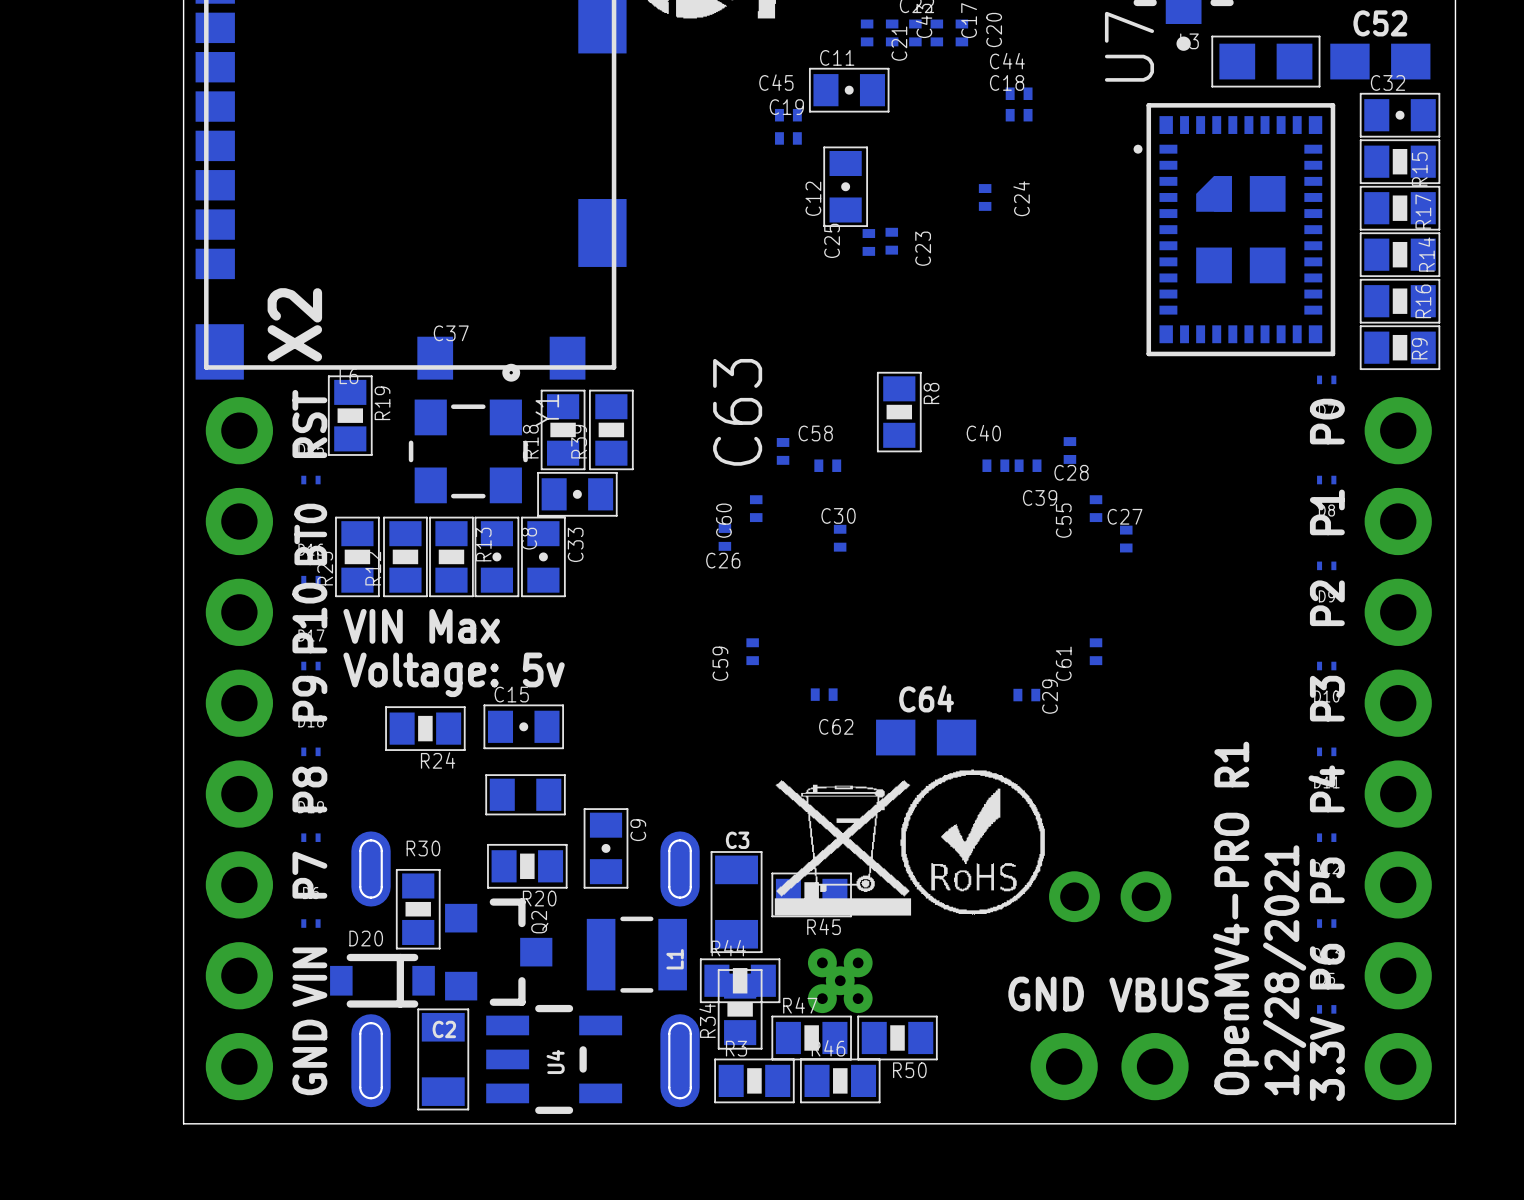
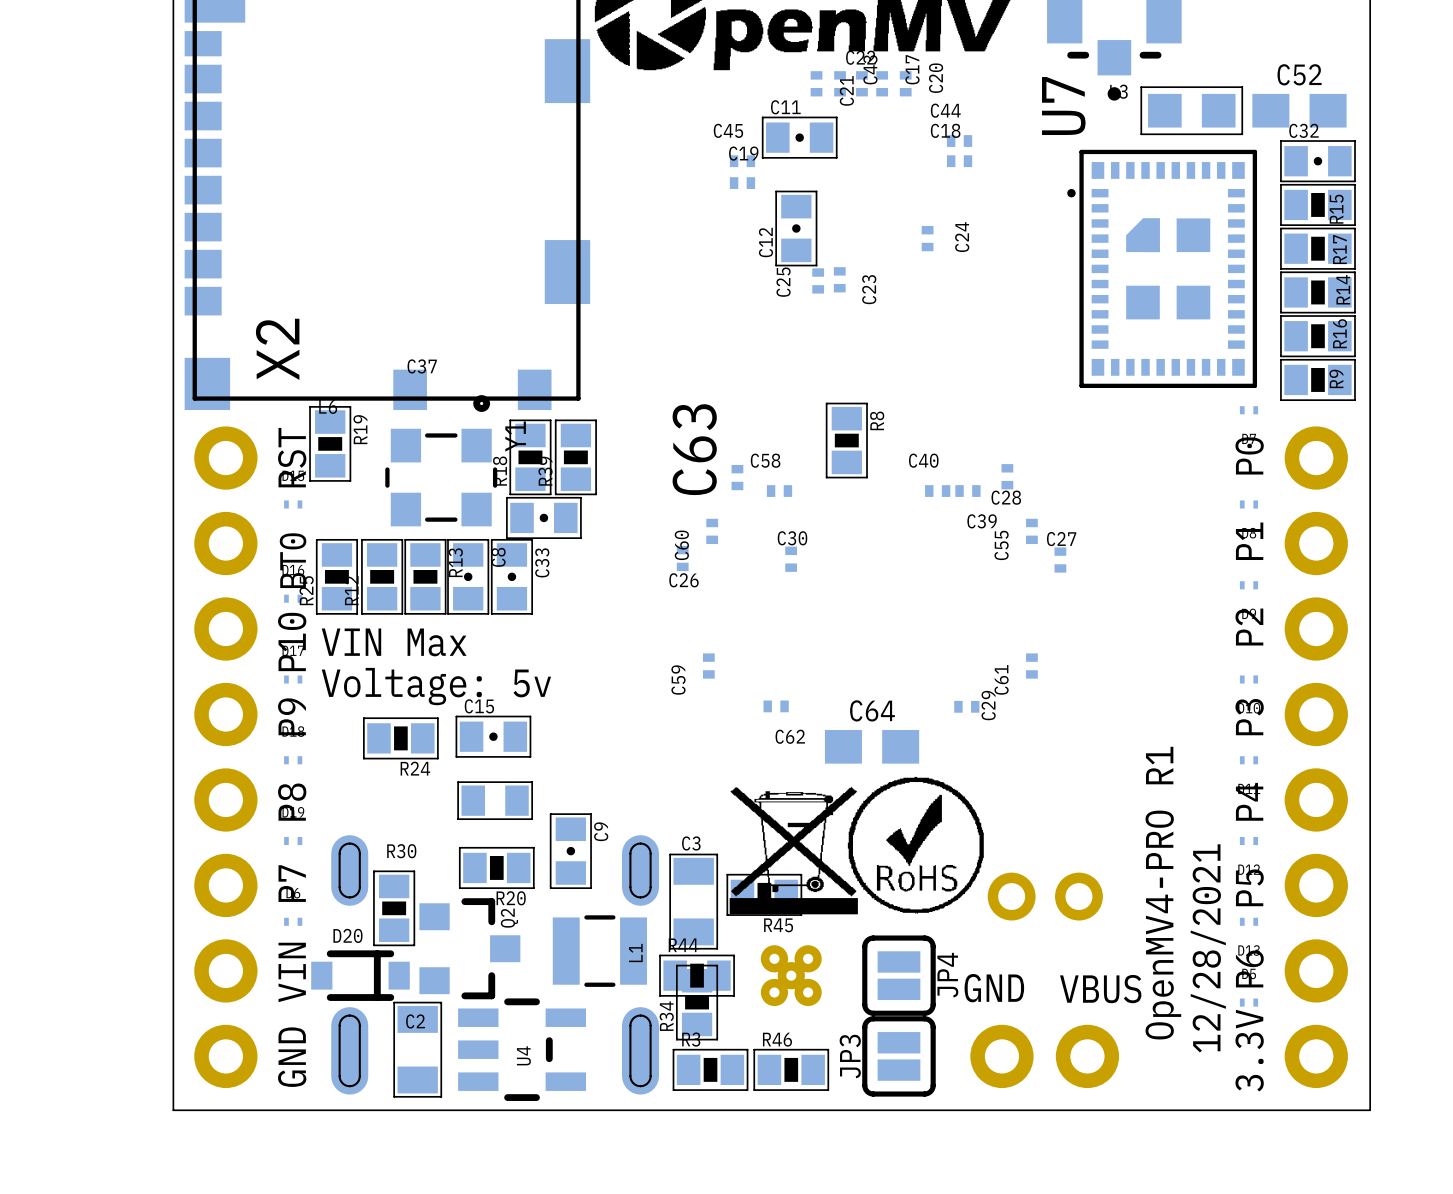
JP4: none -> (898, 975)
R47: (811, 1037) -> none
R50: (897, 1037) -> none
JP3: none -> (898, 1056)

